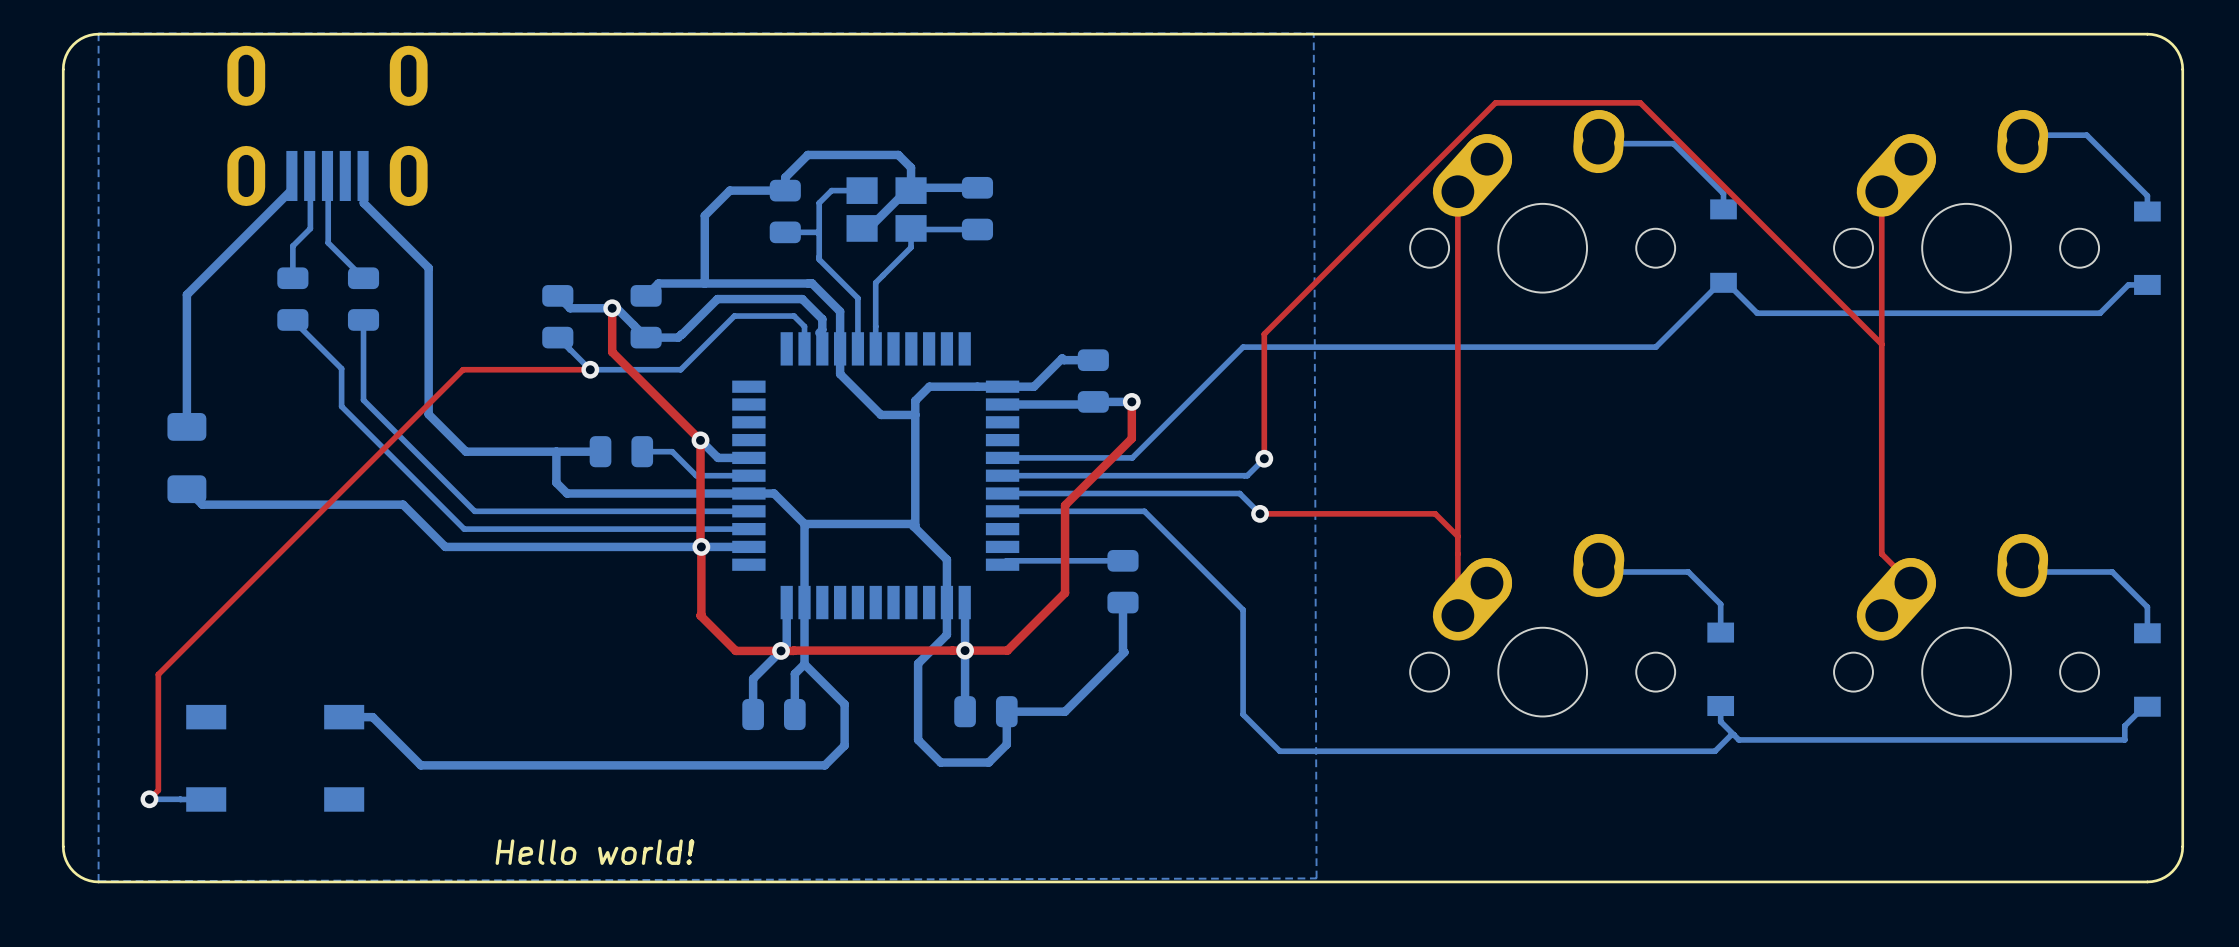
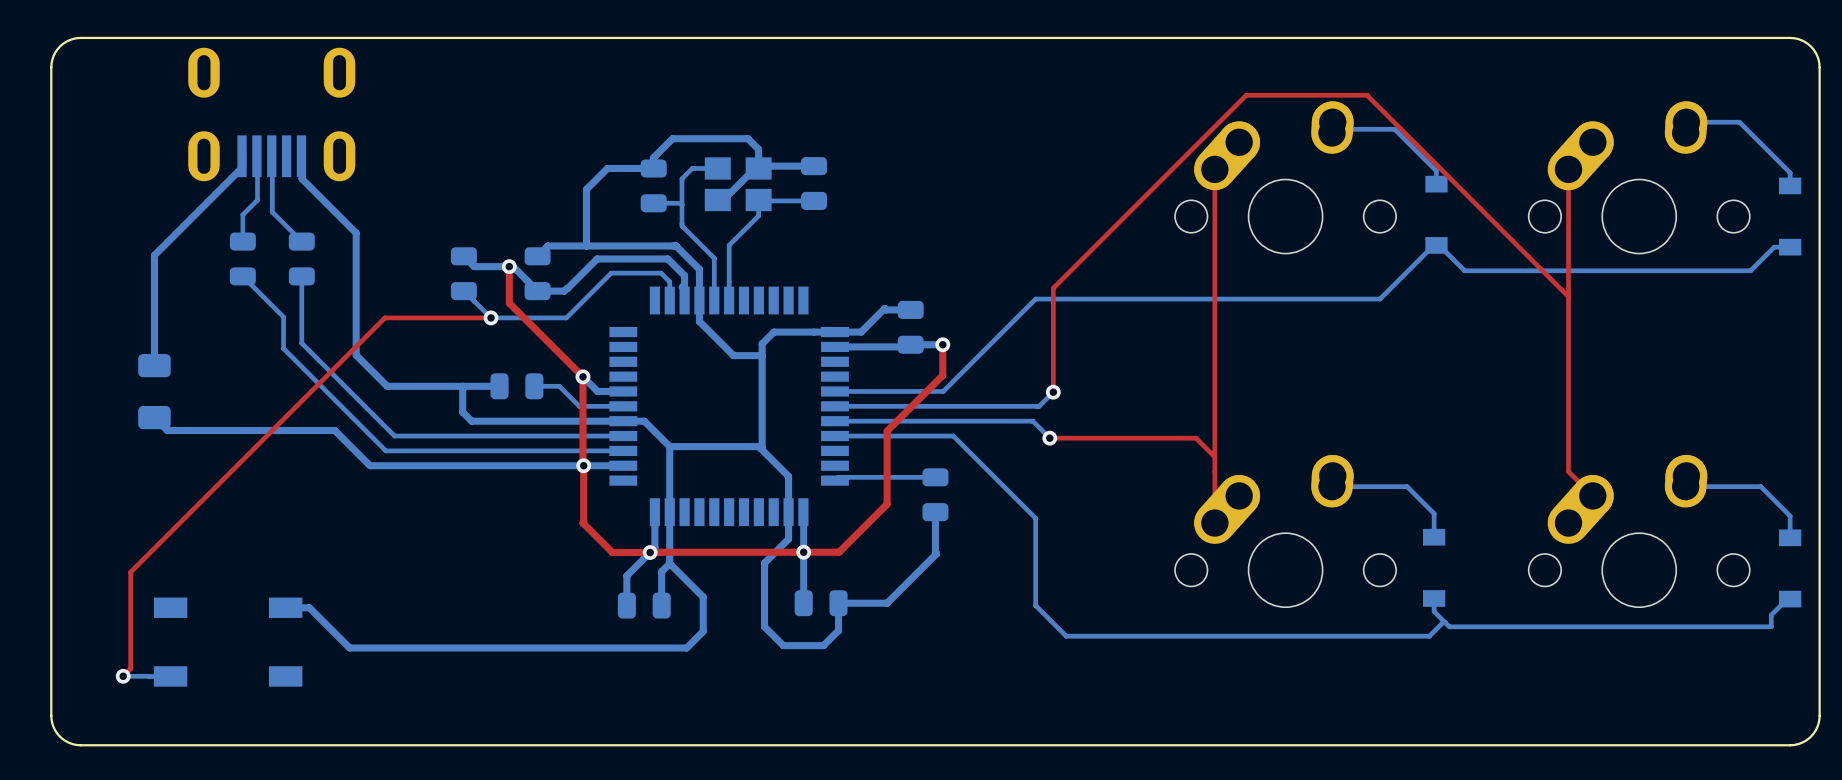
bottom zone outline: (98, 33) (98, 881) (1316, 878) (1313, 33) (98, 33) -> none
text: Hello world! (594, 852) -> none

